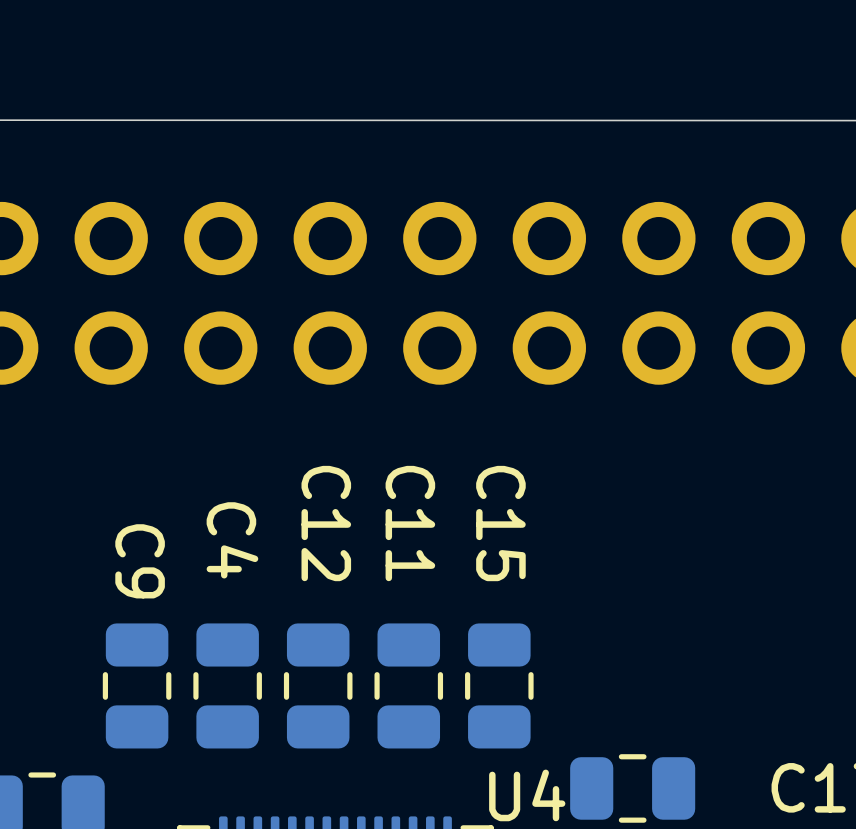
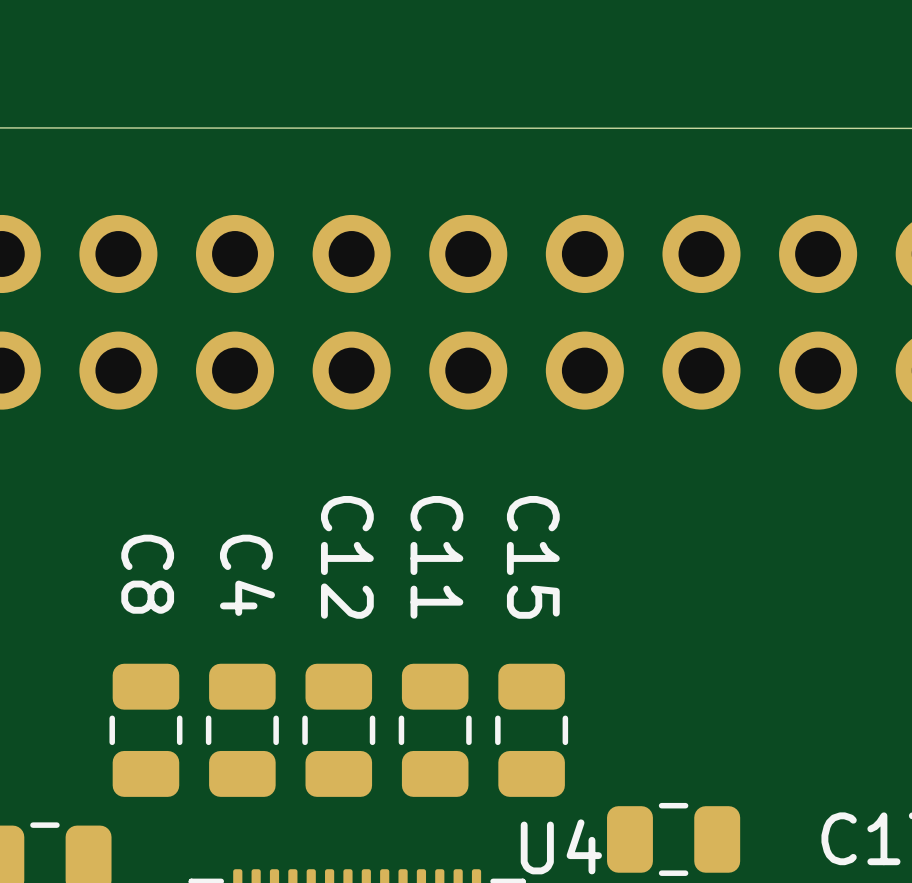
C9 name: C9 (140, 561) -> C8 (147, 574)

